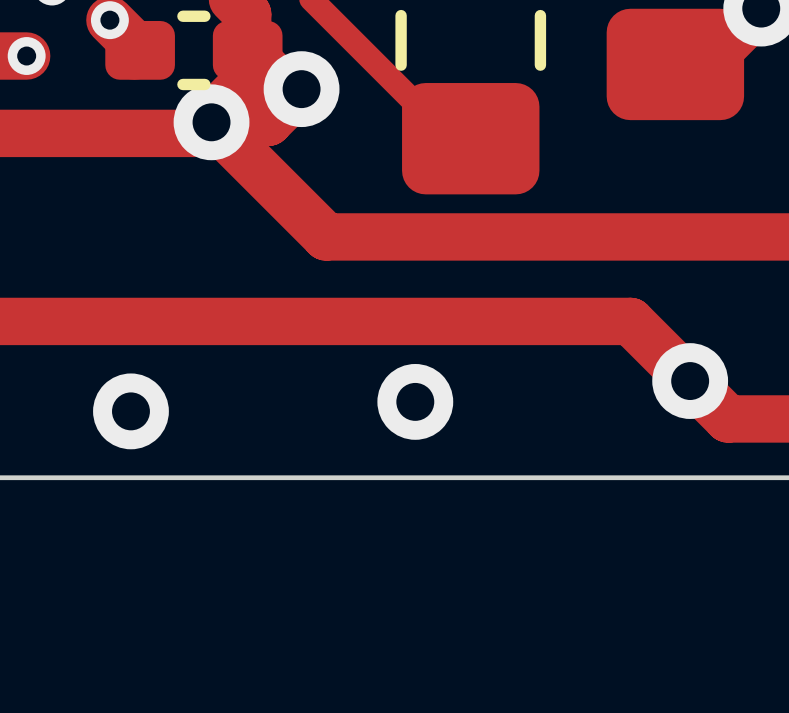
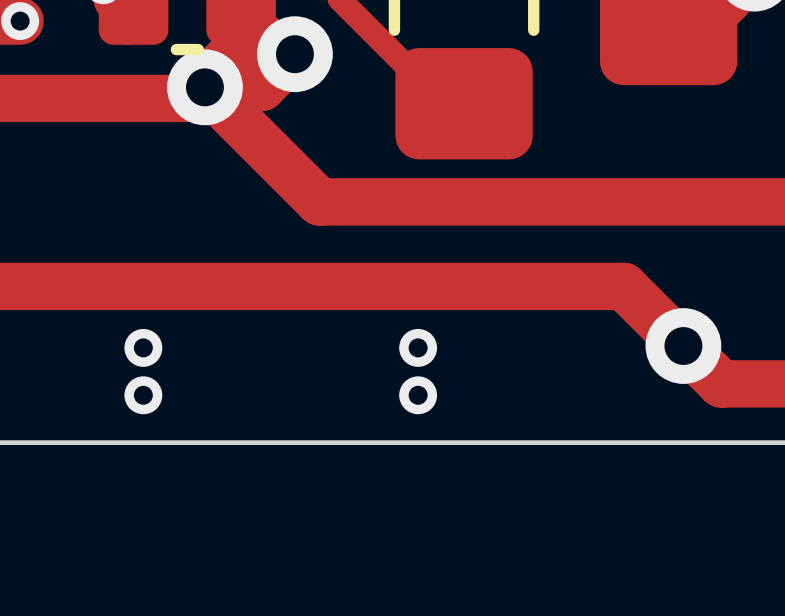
via: none -> (143, 347)
via: none -> (418, 347)
via: (415, 401) -> none
via: (130, 411) -> none
via: none -> (143, 395)
via: none -> (418, 395)

